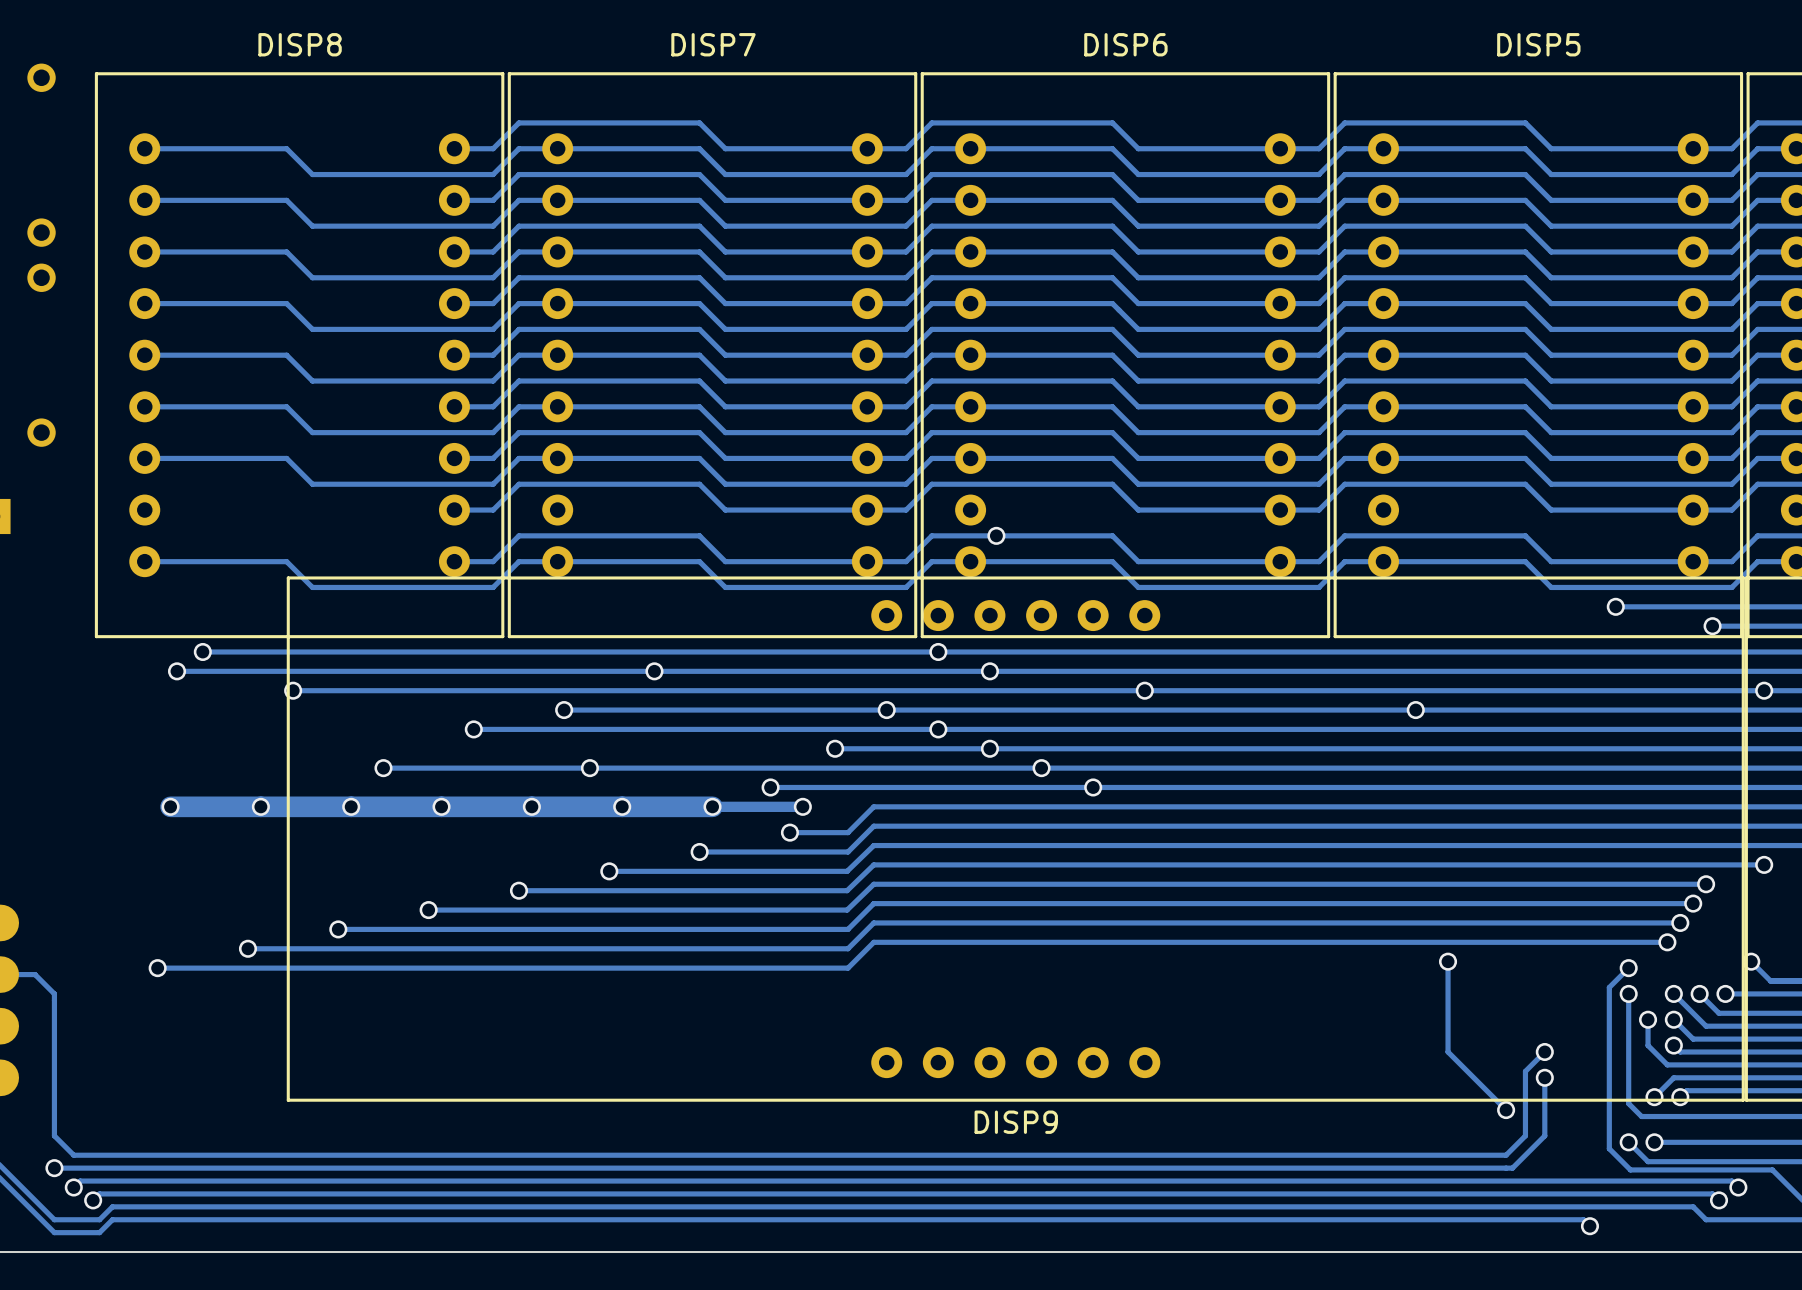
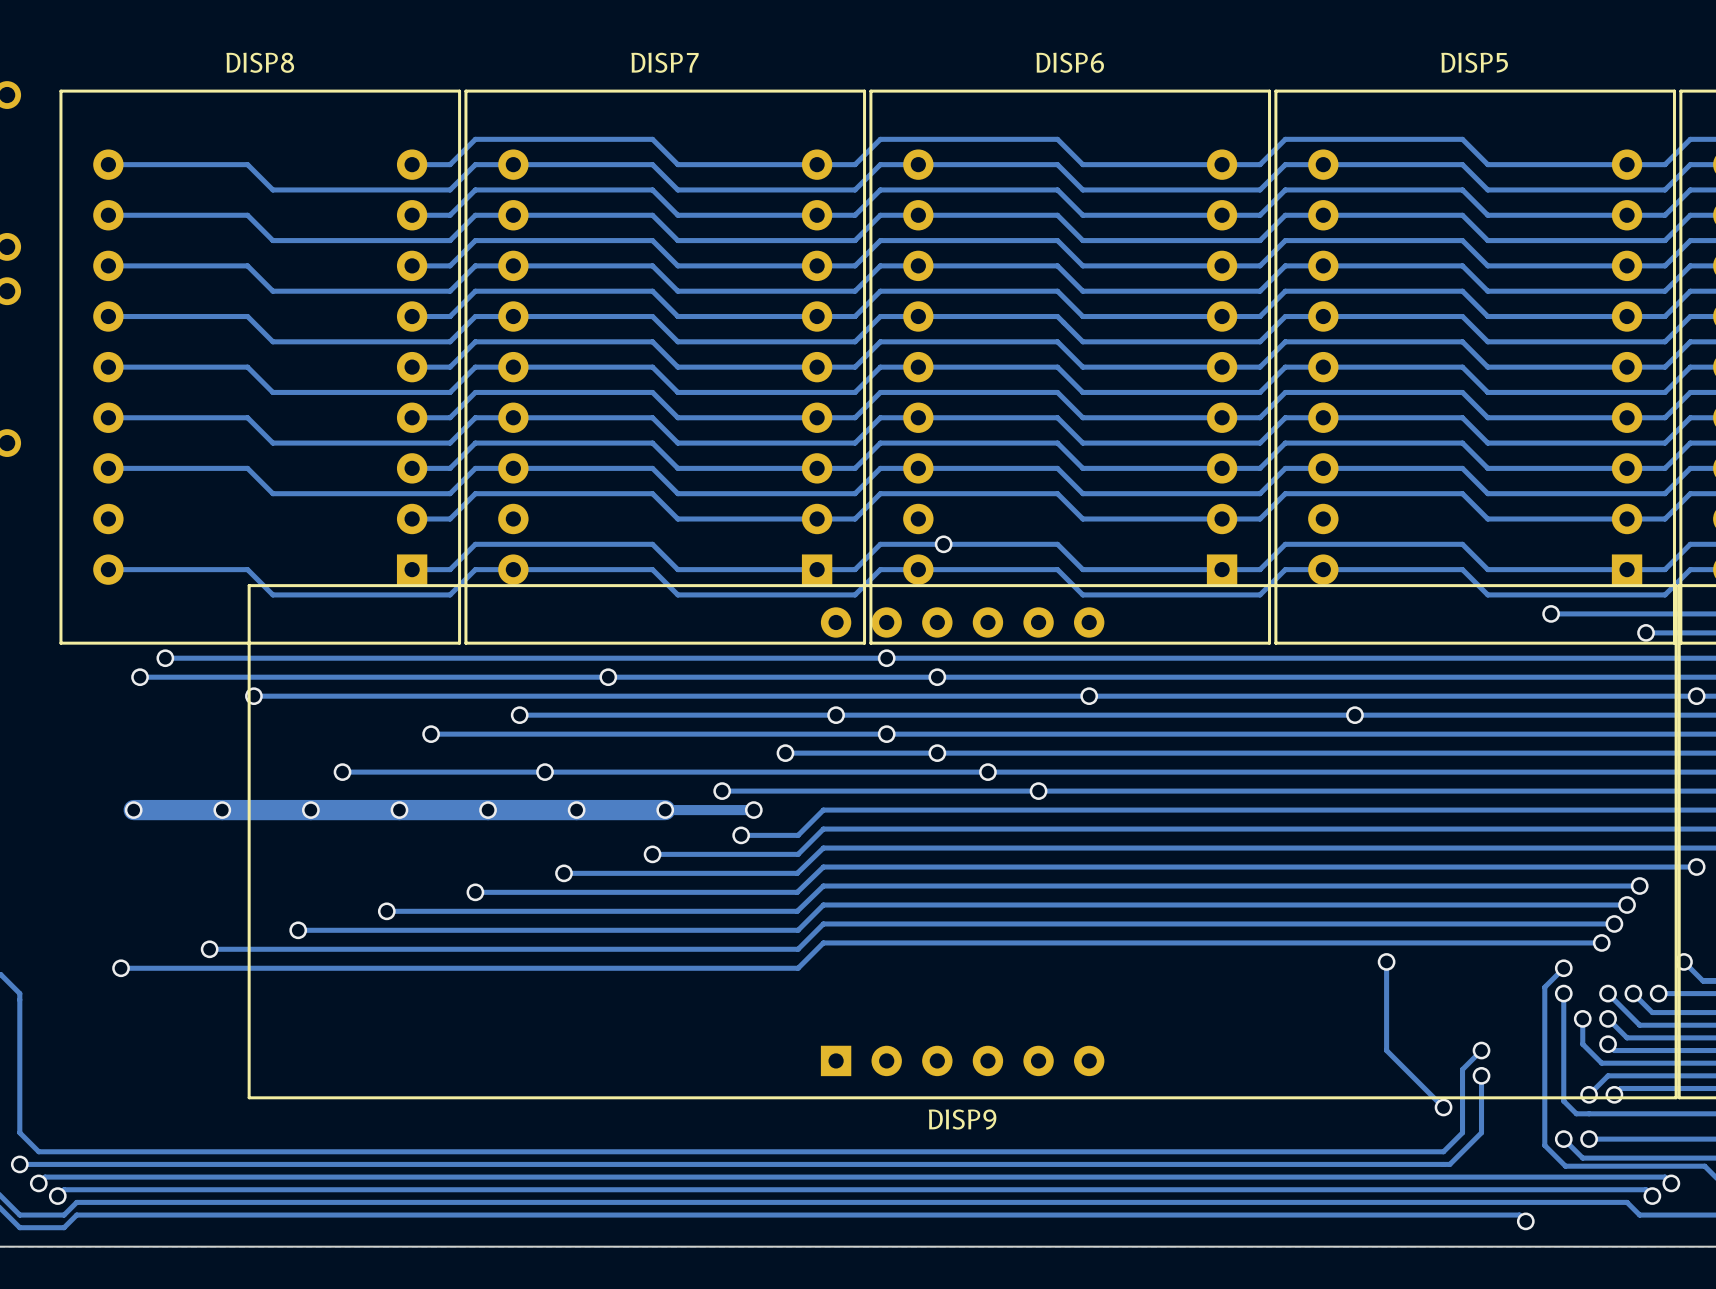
DISP8 footprint: [94, 72, 505, 639] -> [59, 89, 462, 645]
DISP7 footprint: [507, 72, 918, 639] -> [464, 89, 867, 645]
DISP6 footprint: [920, 72, 1331, 639] -> [869, 89, 1272, 645]
DISP5 footprint: [1333, 72, 1744, 639] -> [1274, 89, 1676, 645]
DISP9 footprint: [286, 576, 1745, 1102] -> [247, 584, 1678, 1100]

